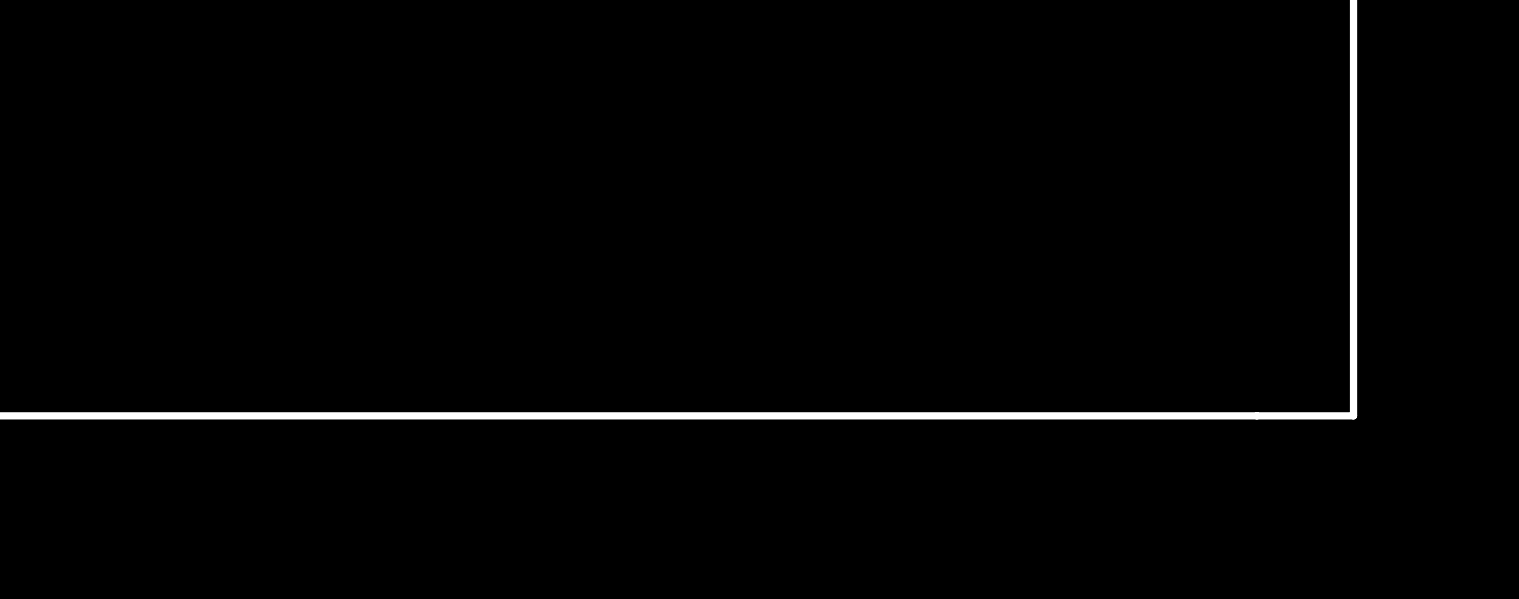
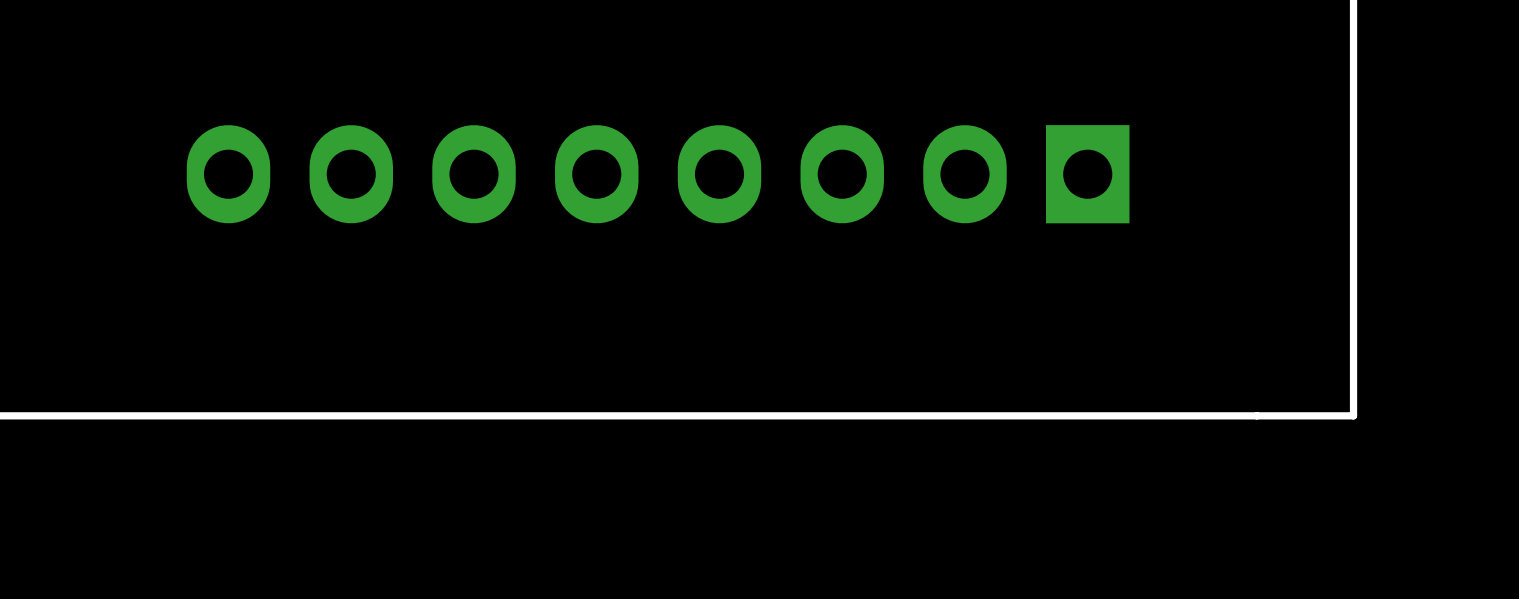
part: none -> (658, 174)

